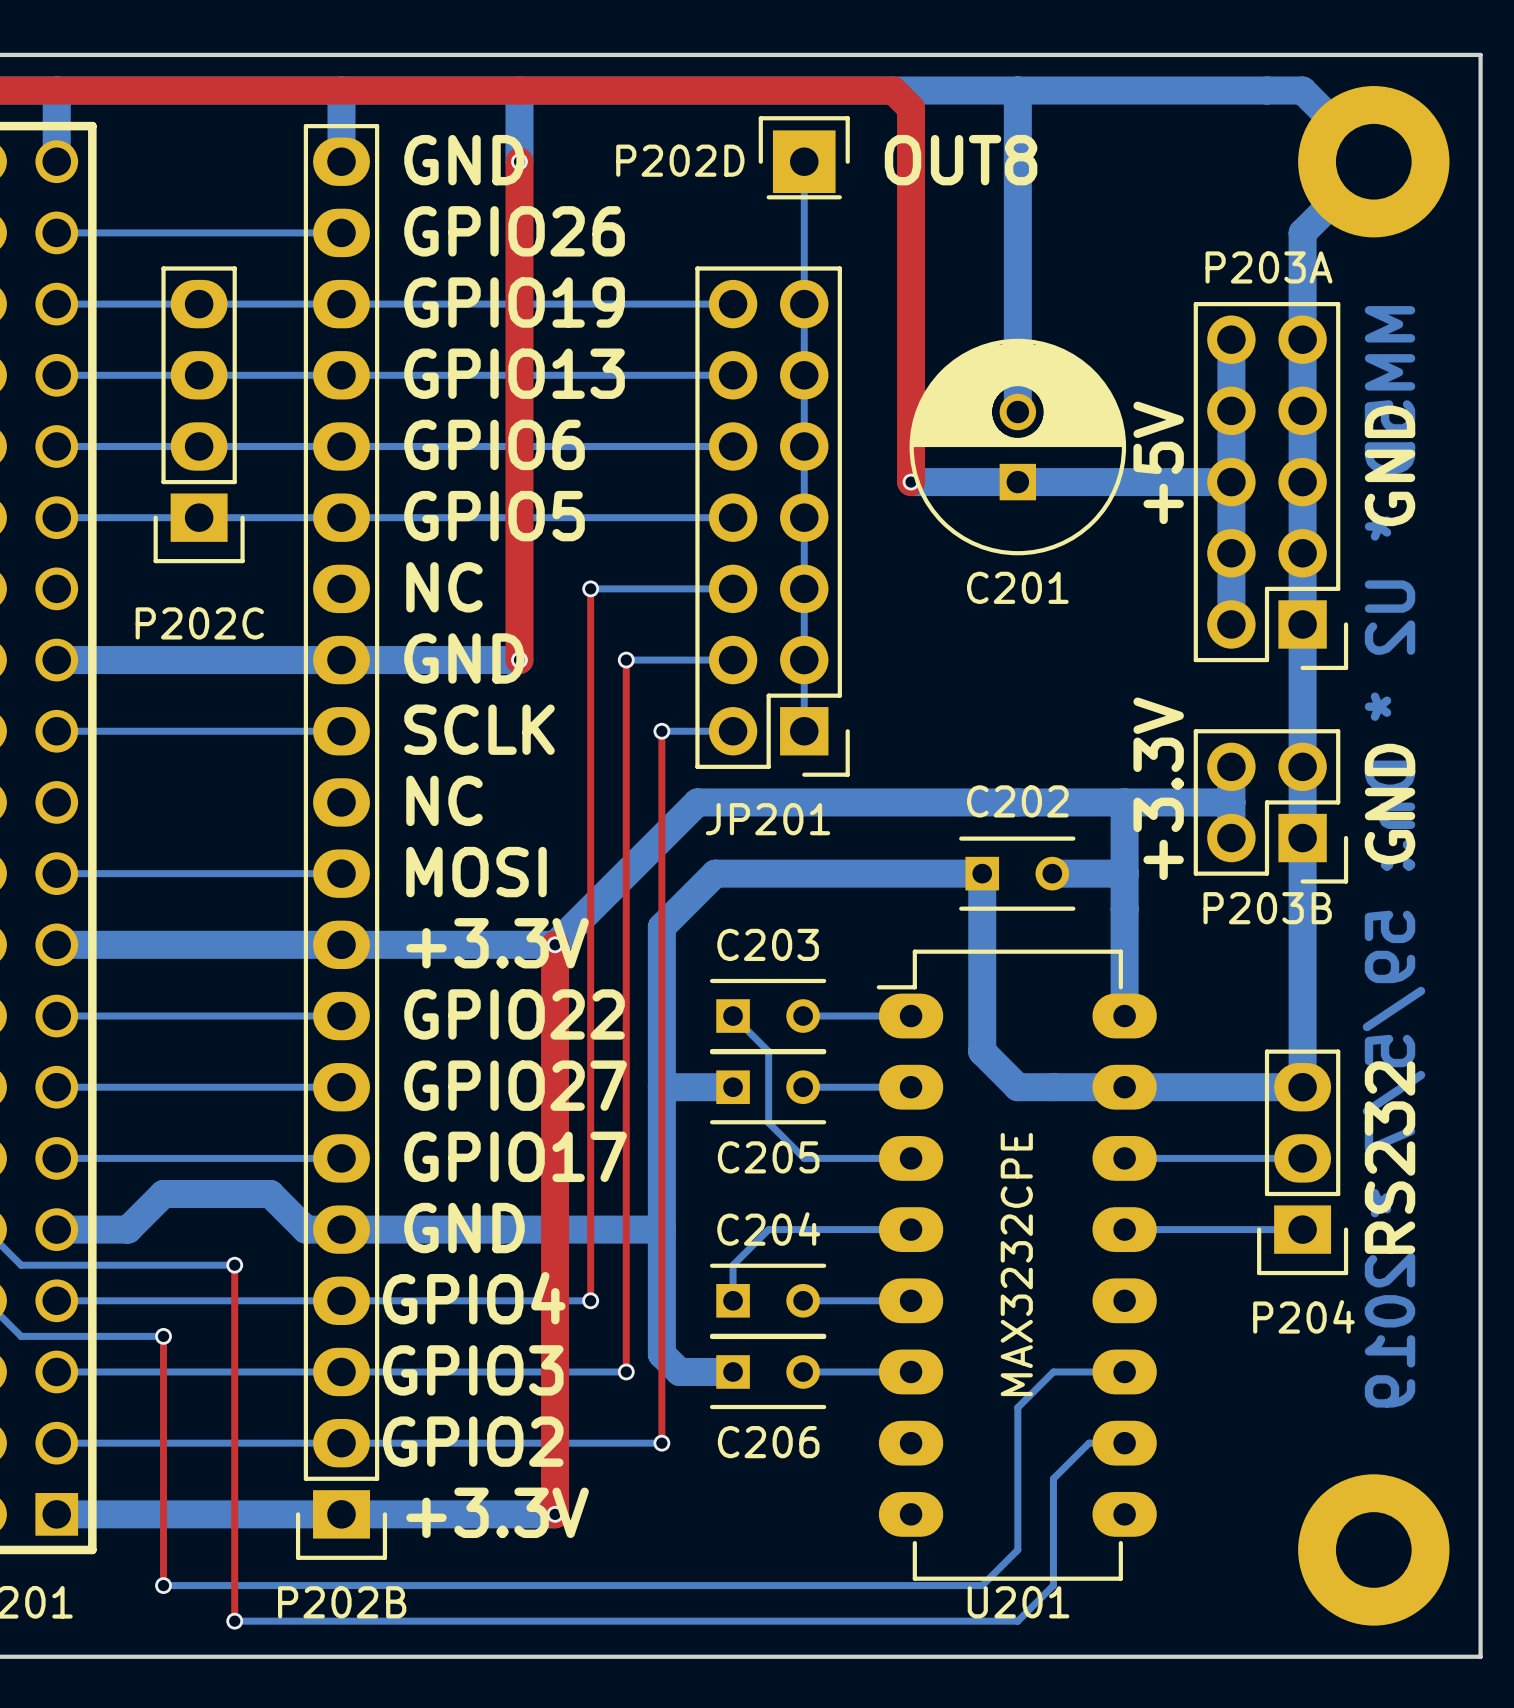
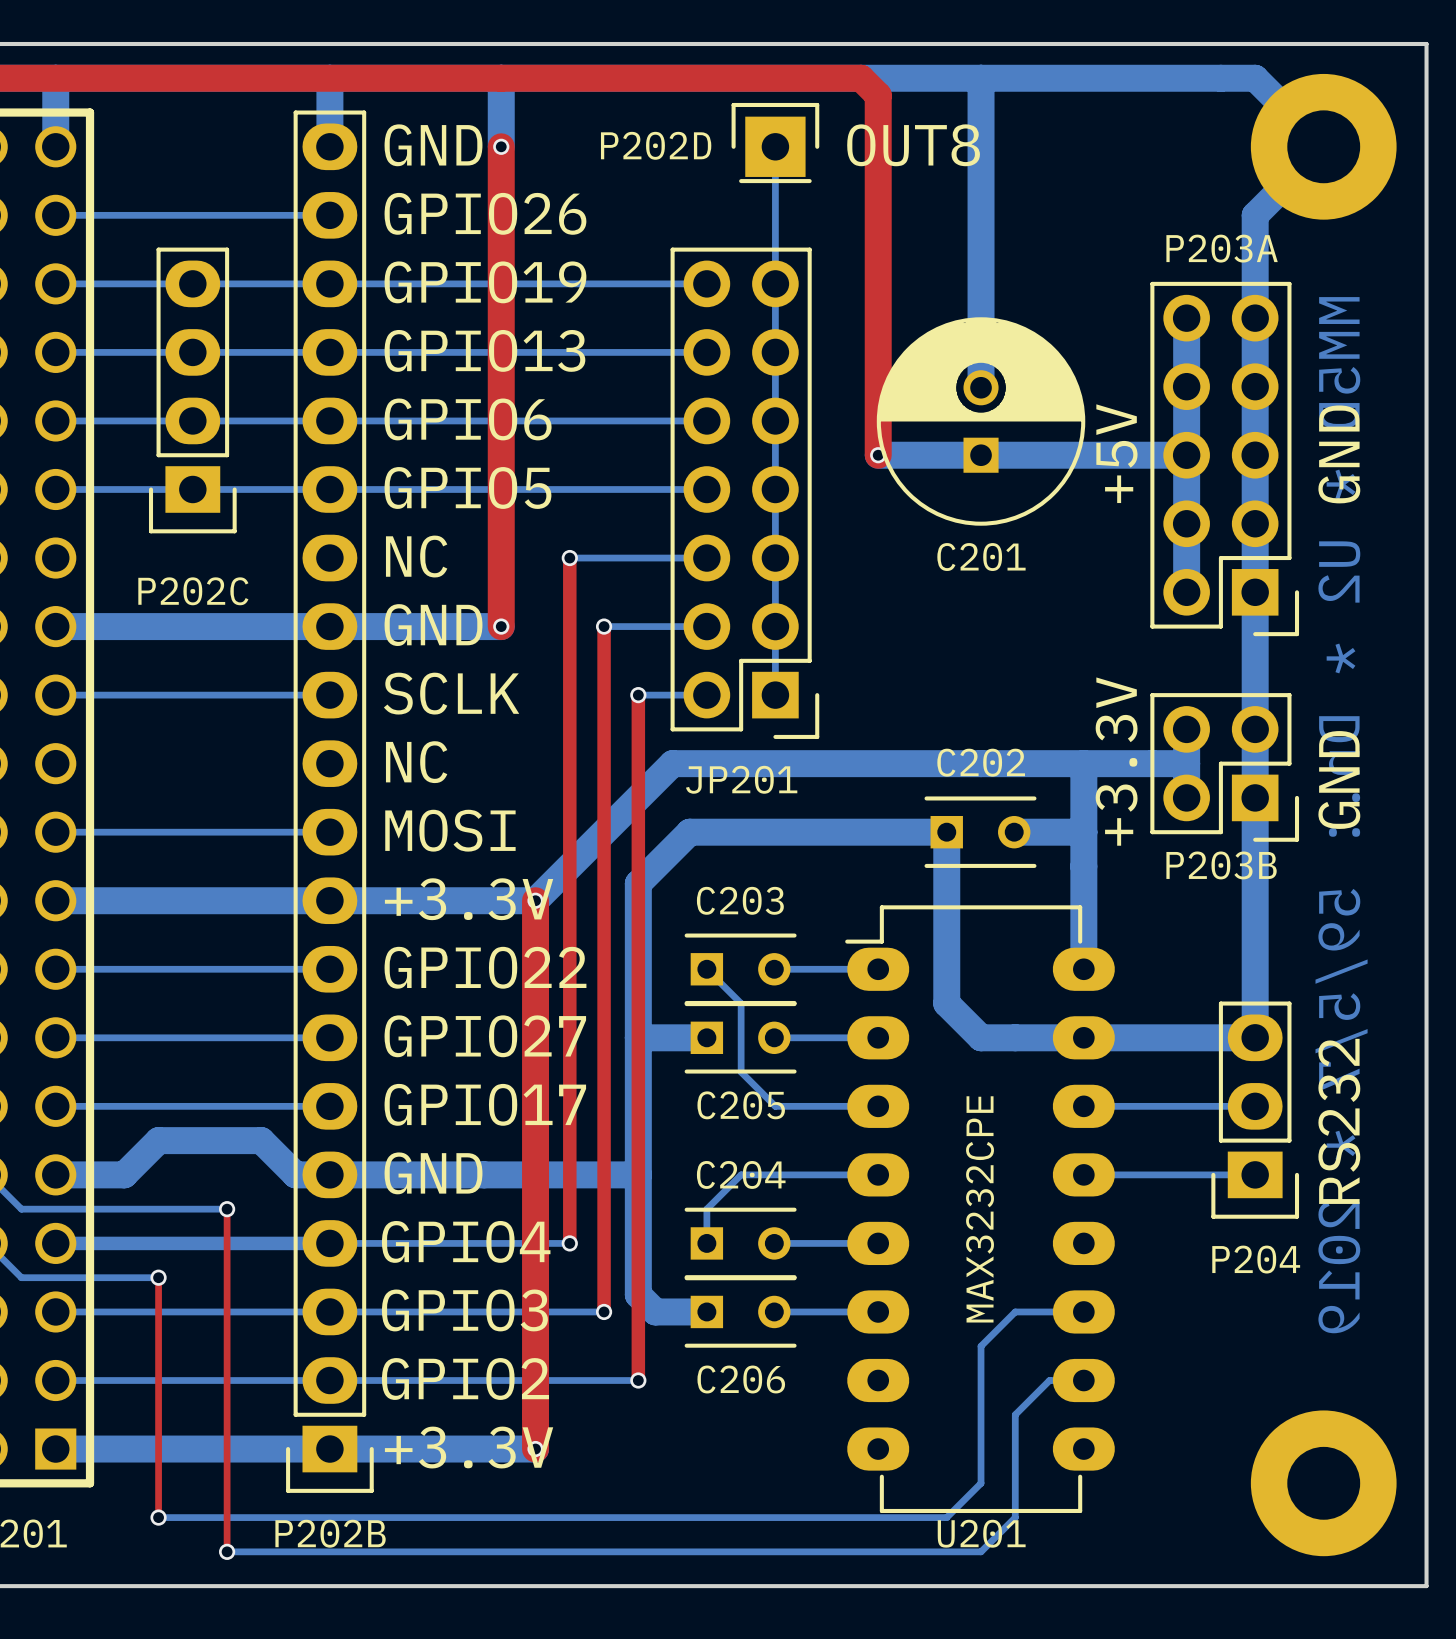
top track width: thin (590, 588) (590, 1300) -> thick (569, 558) (569, 1243)
top track width: thin (626, 660) (626, 1371) -> thick (604, 626) (604, 1311)
top track width: thin (661, 731) (661, 1443) -> thick (638, 695) (638, 1380)
bottom track width: thin (56, 1300) (341, 1300) -> thick (55, 1243) (329, 1243)

